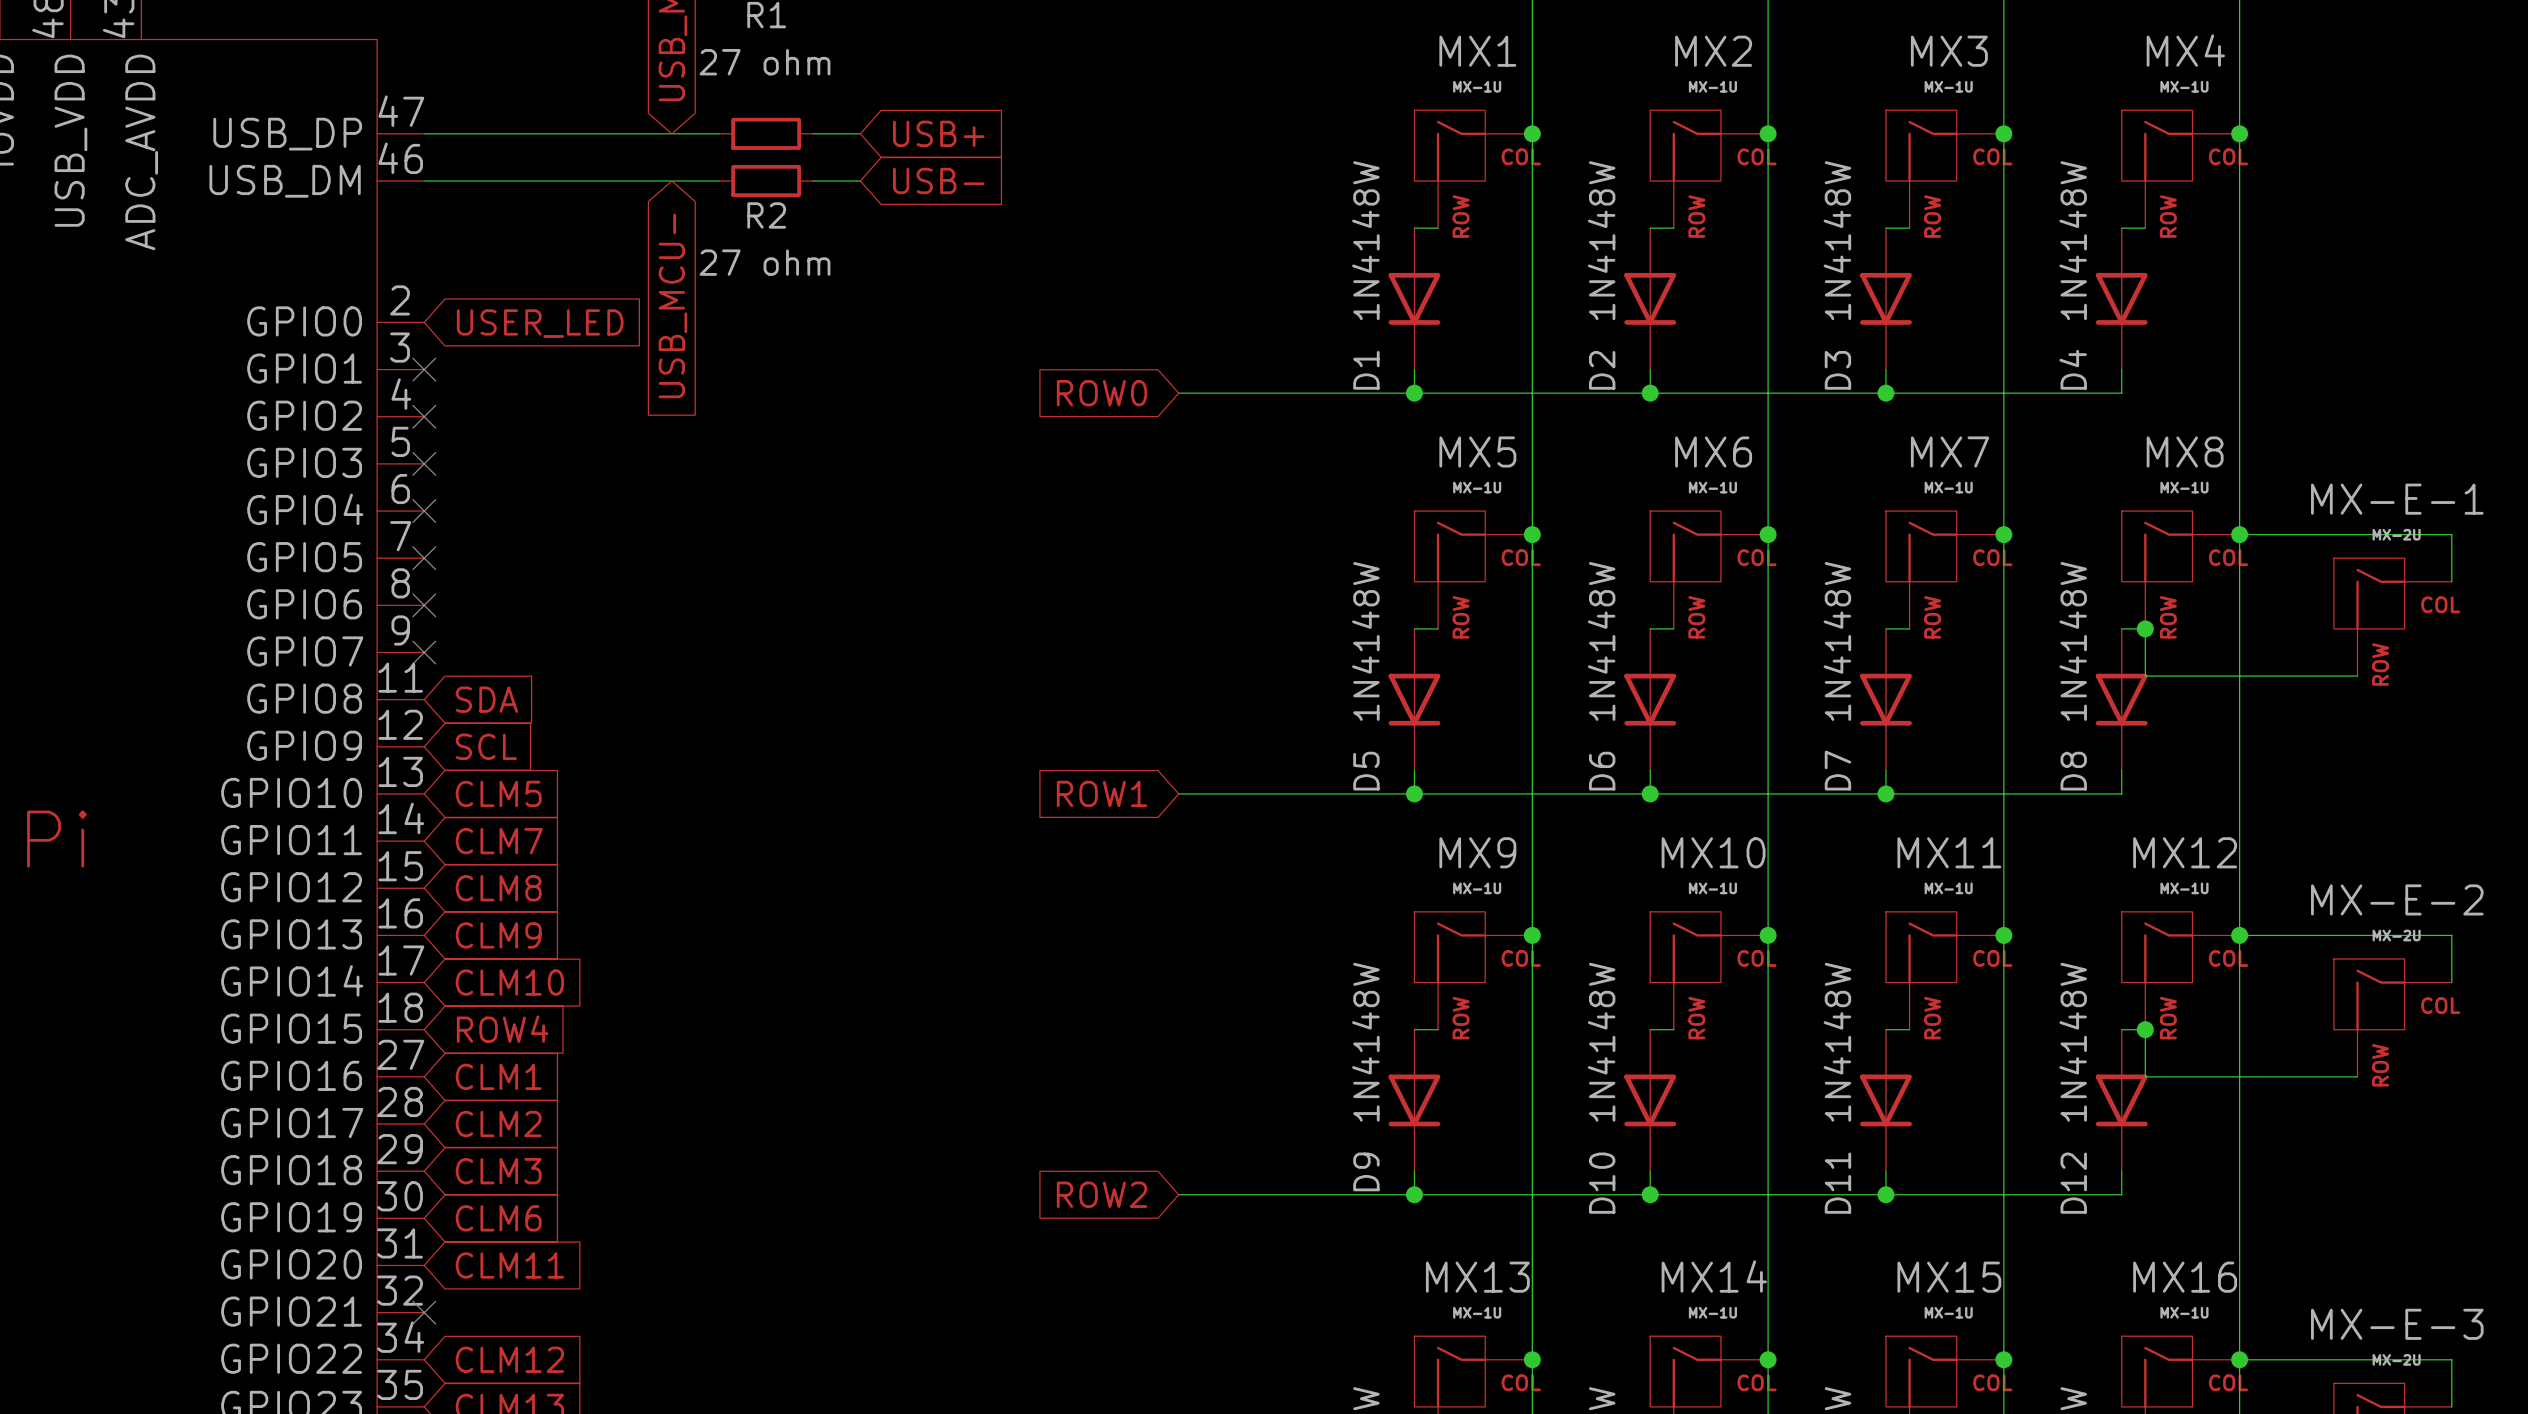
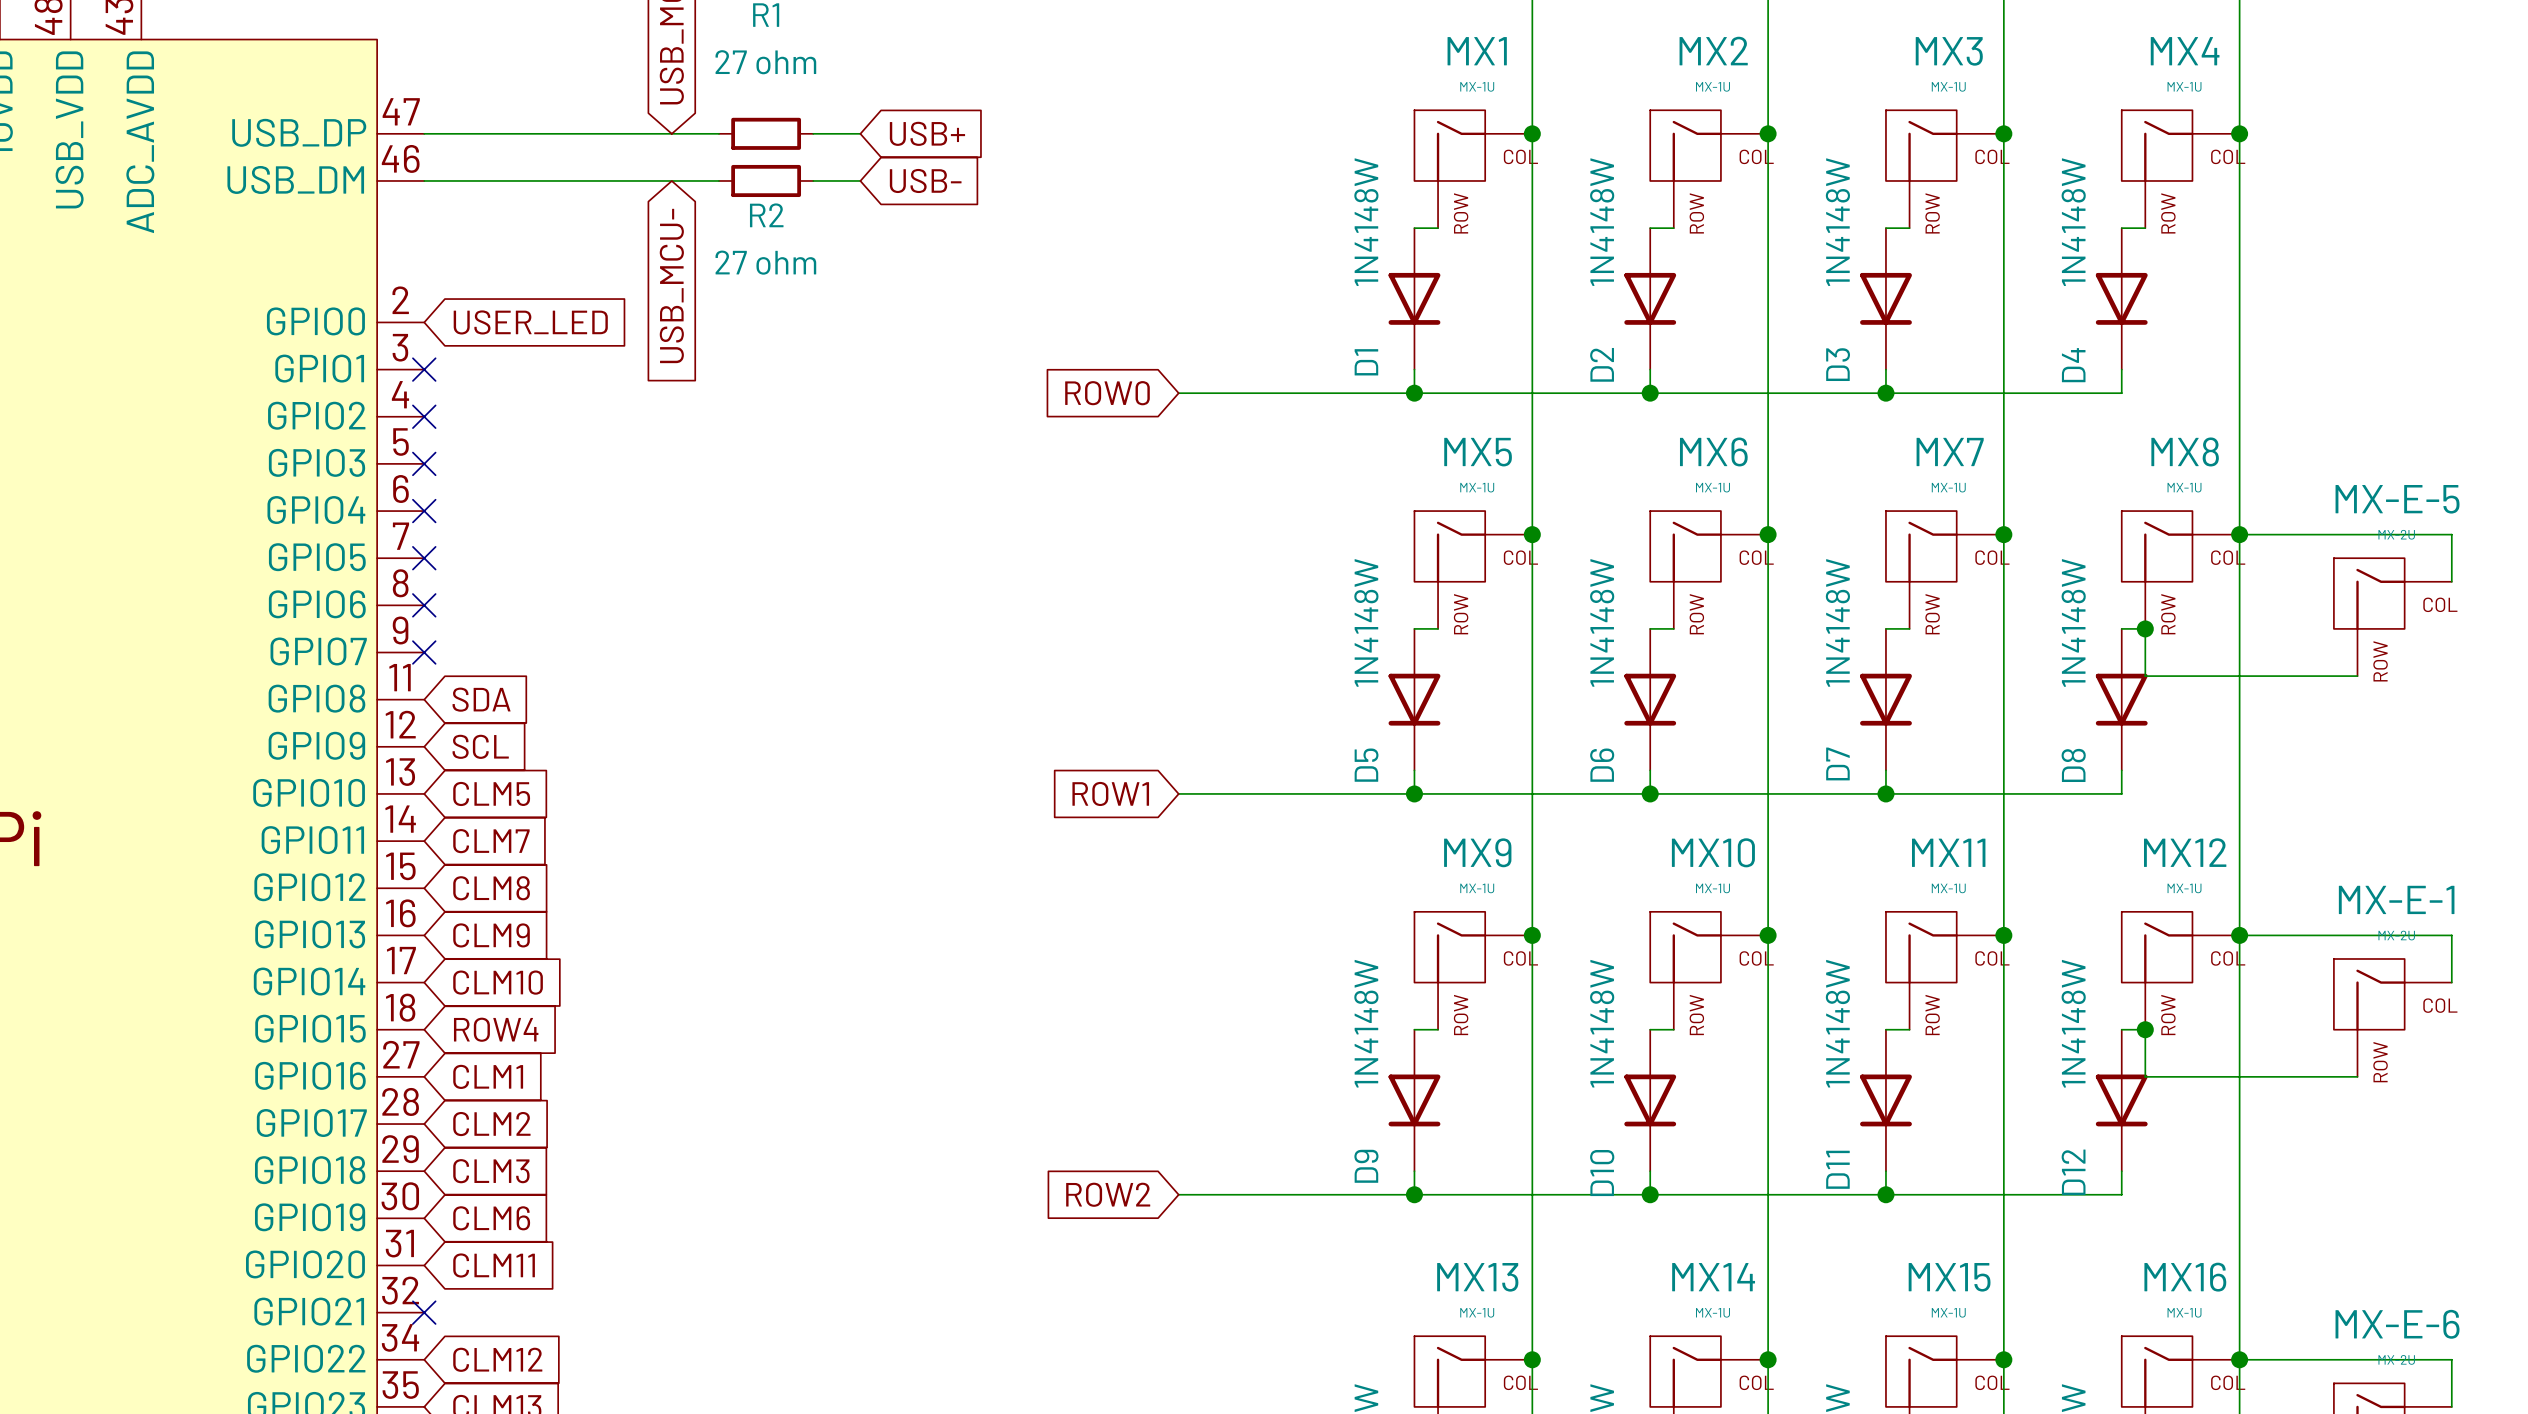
MX-E-1 name: MX-E-1 (2397, 499) -> MX-E-5 (2397, 499)
MX-E-2 name: MX-E-2 (2397, 899) -> MX-E-1 (2396, 899)
MX-E-3 name: MX-E-3 (2397, 1324) -> MX-E-6 (2397, 1324)

